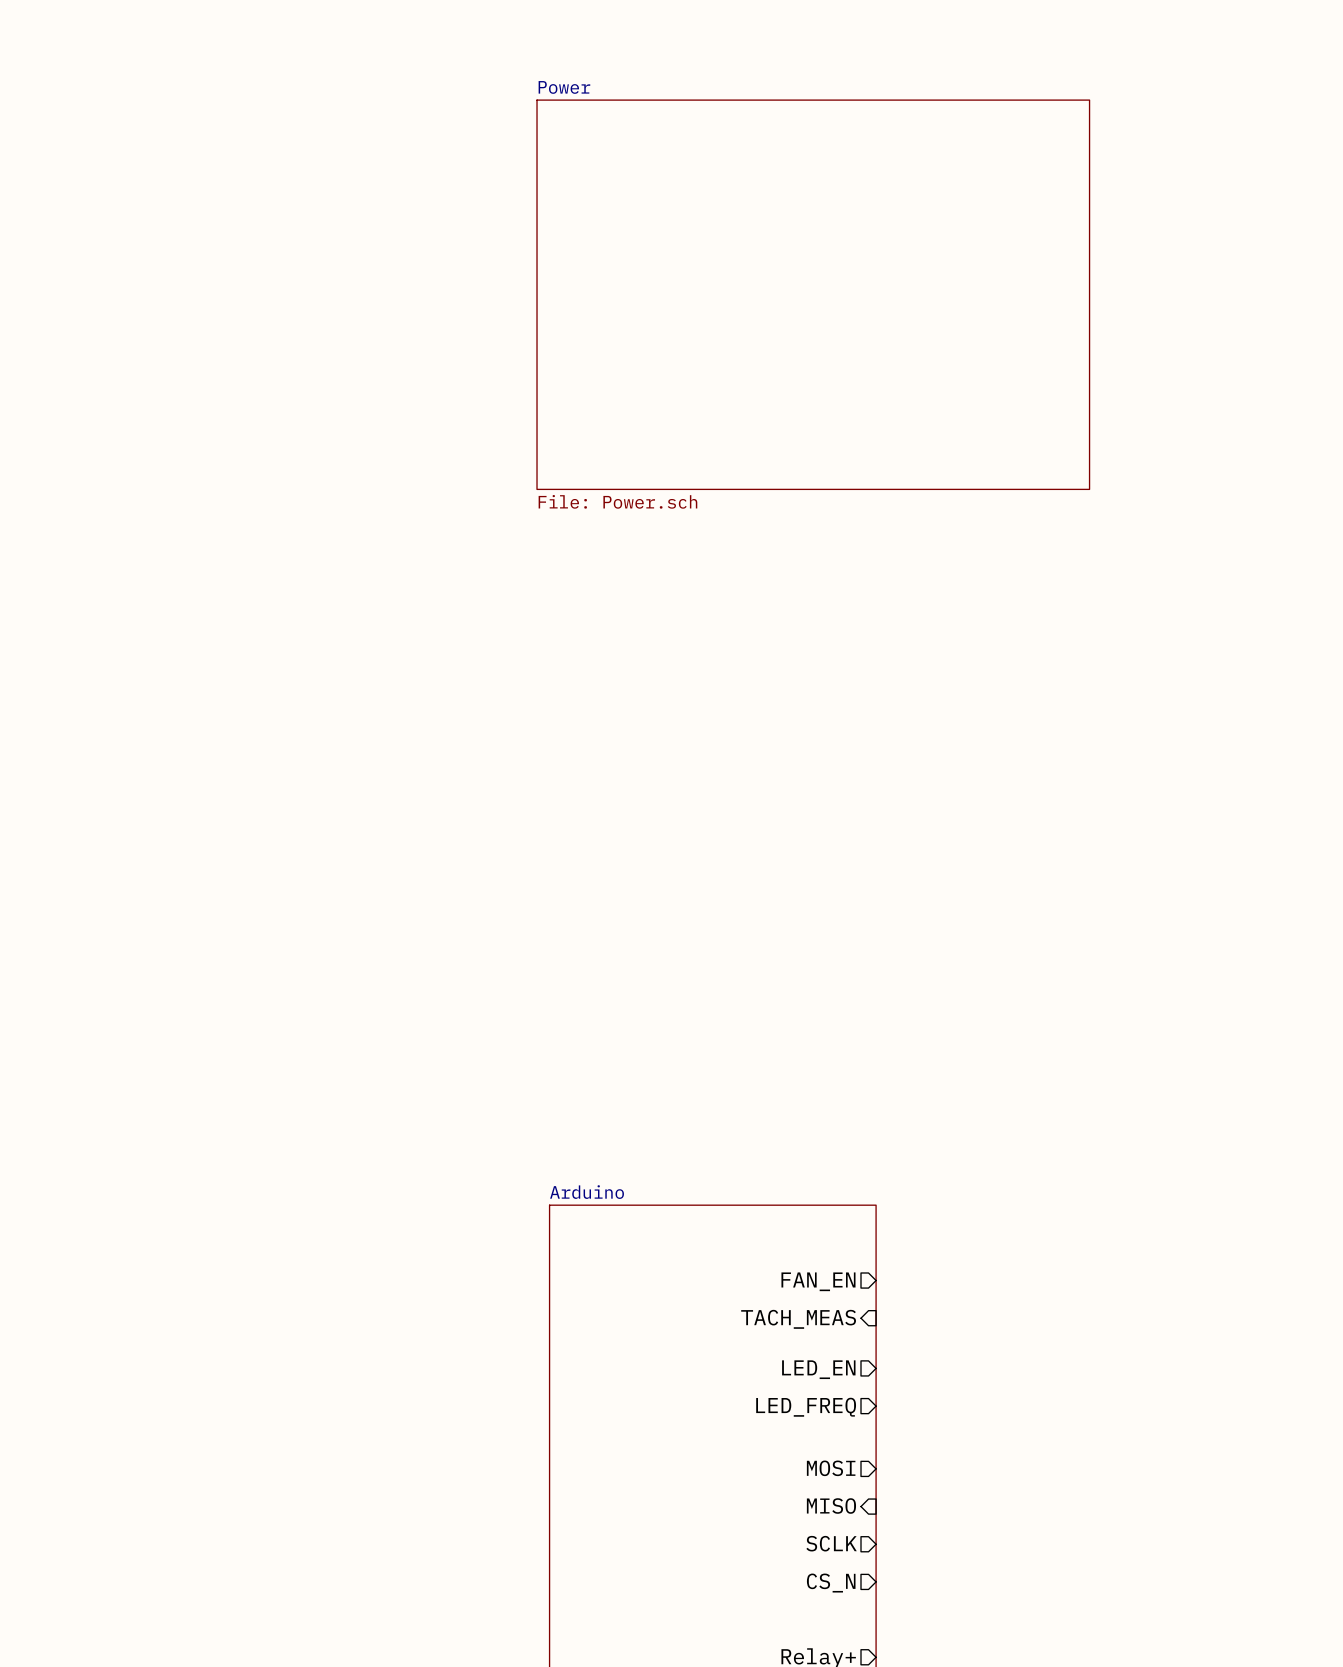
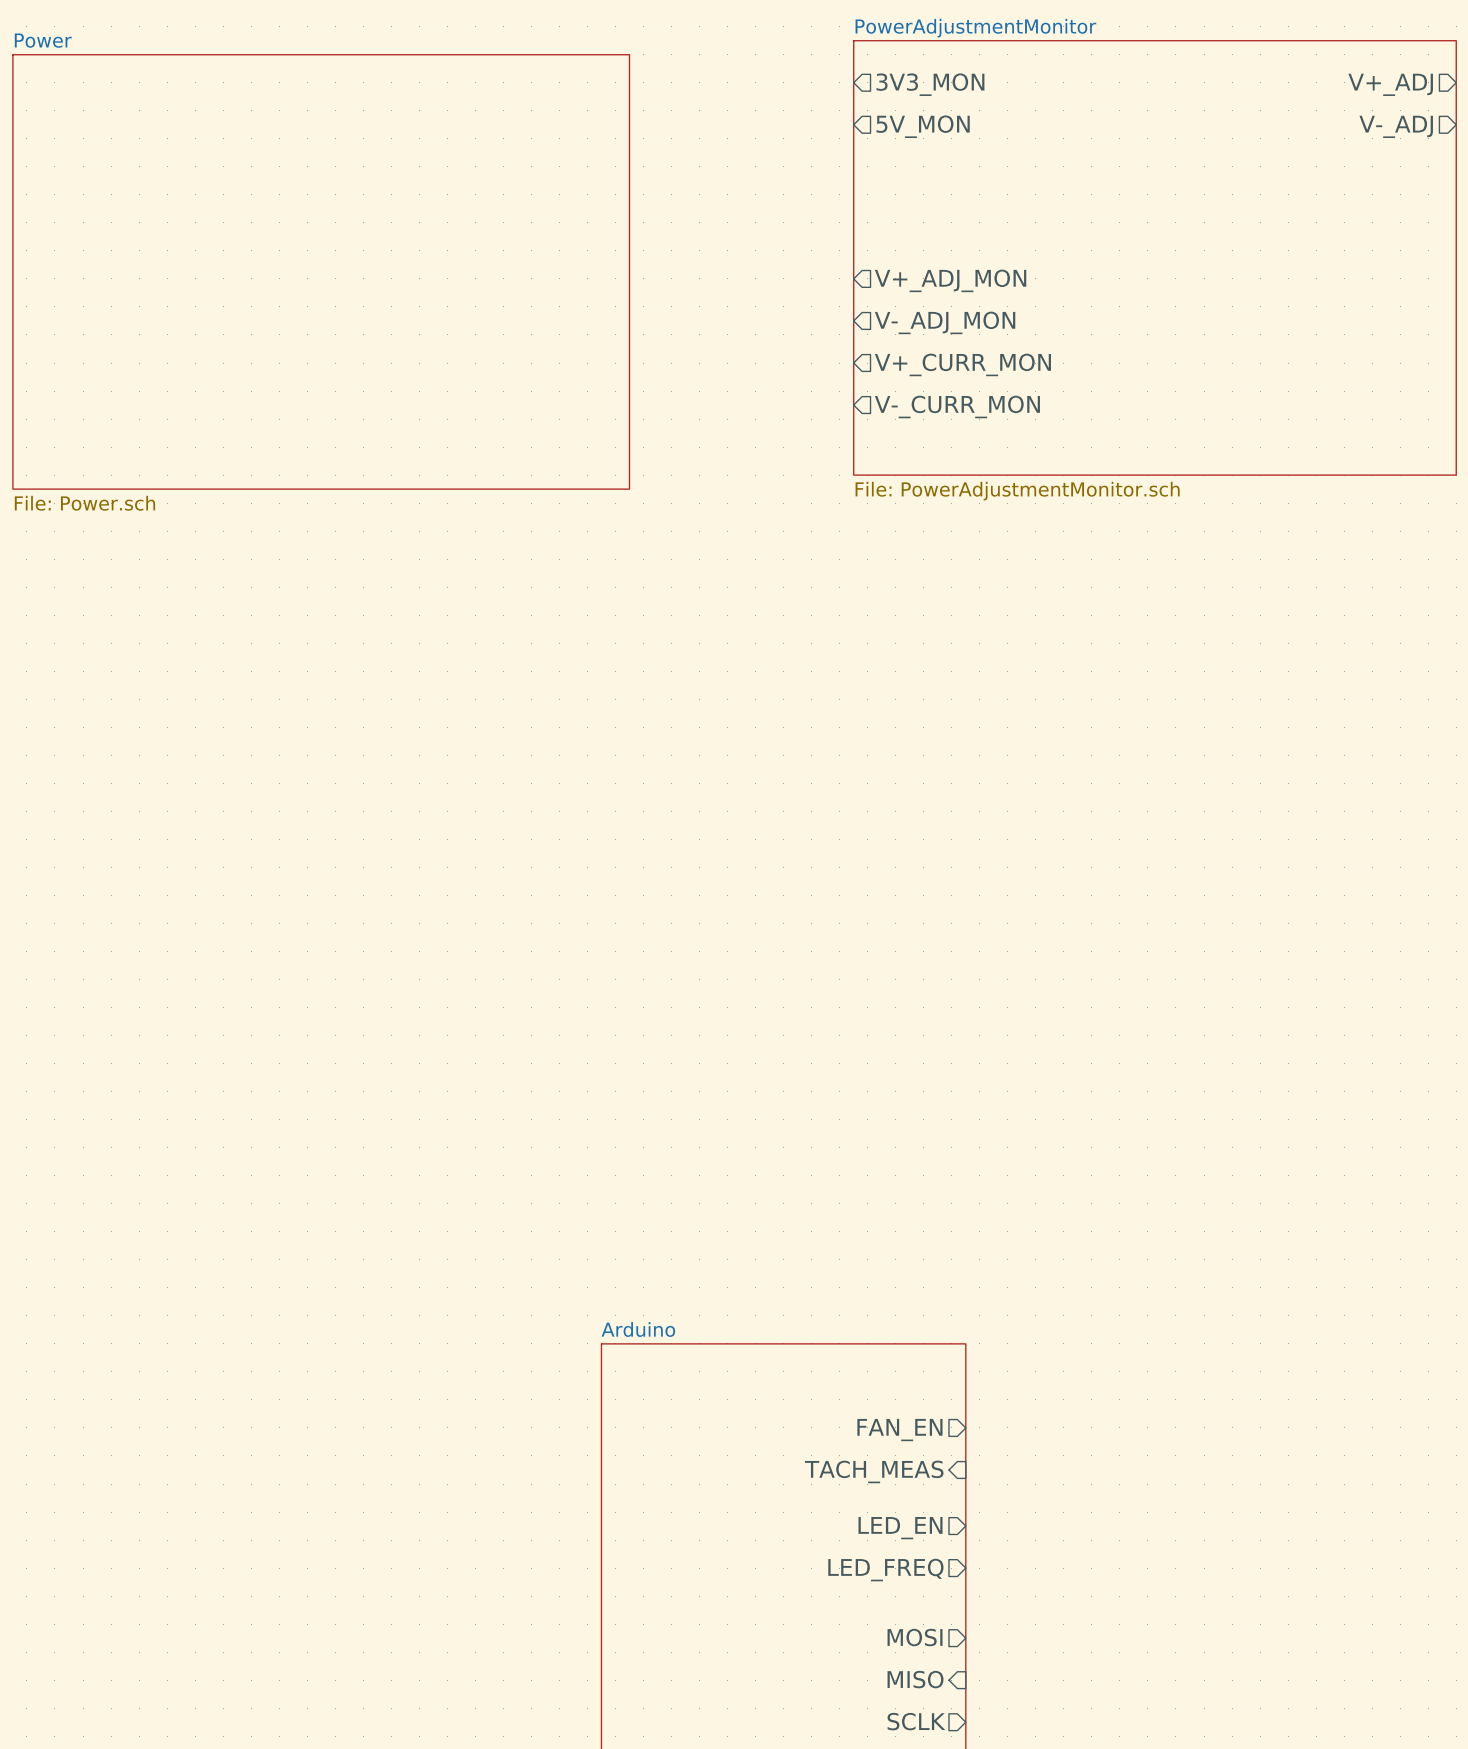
sheet pin: none -> 3V3_MON (930, 84)
sheet pin: none -> V+_ADJ (1390, 84)
sheet pin: none -> 5V_MON (923, 126)
sheet pin: none -> V-_ADJ (1396, 126)
sheet PowerAdjustmentMonitor: none -> File: PowerAdjustmentMonitor.sch (1154, 257)
sheet Power: none -> File: Power.sch (321, 271)
sheet pin: none -> V+_ADJ_MON (950, 280)
sheet pin: none -> V-_ADJ_MON (945, 322)
sheet Power: File: Power.sch (813, 294) -> none
sheet pin: none -> V+_CURR_MON (962, 364)
sheet pin: none -> V-_CURR_MON (957, 406)

